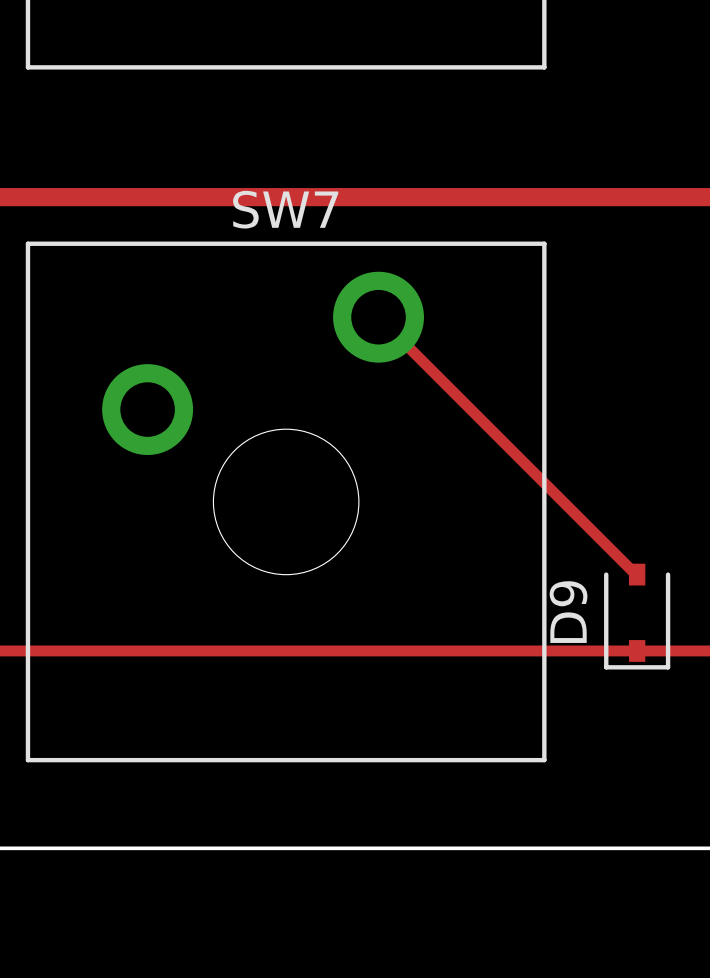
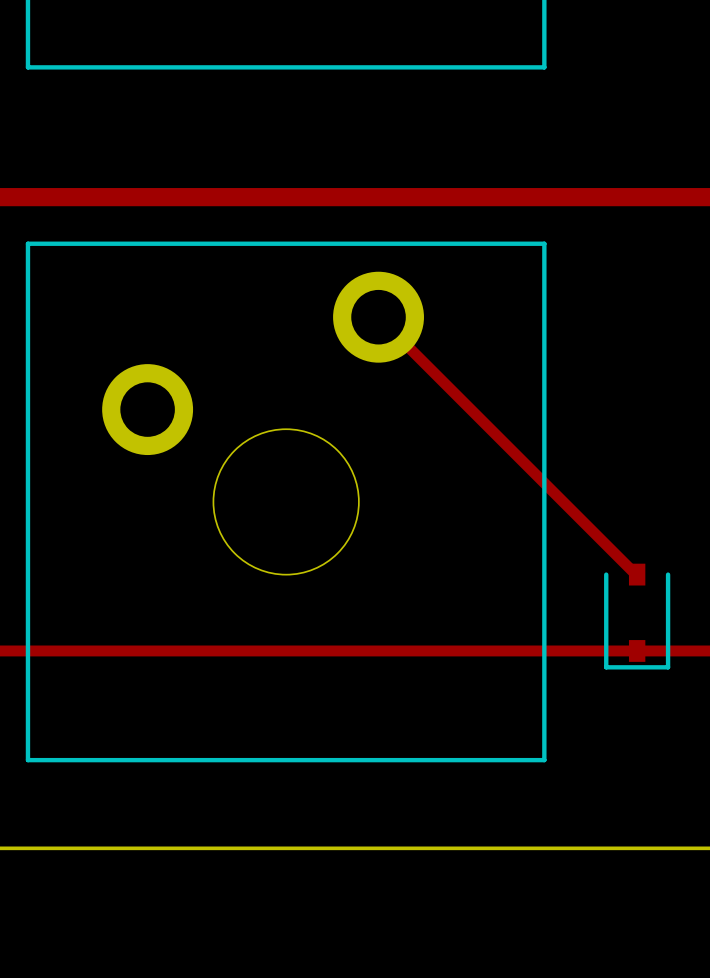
SW7 name: SW7 (285, 209) -> none
D9 name: D9 (568, 612) -> none

